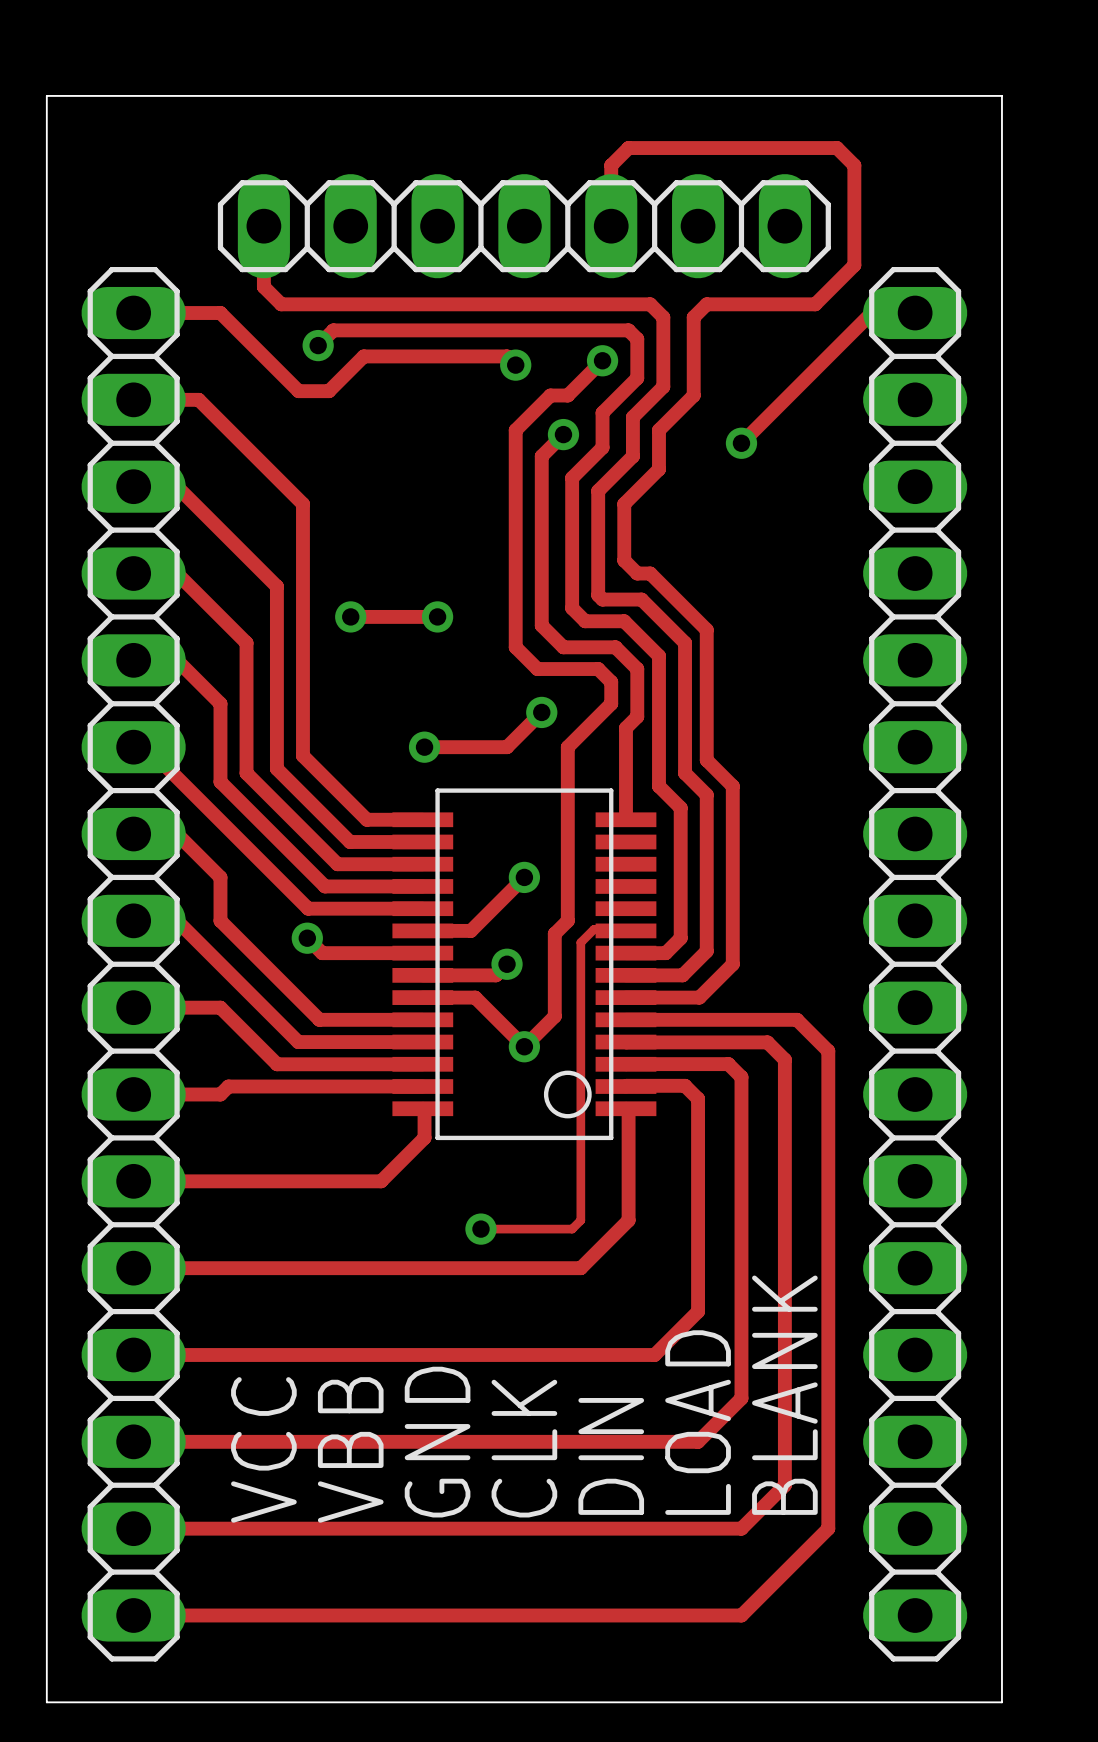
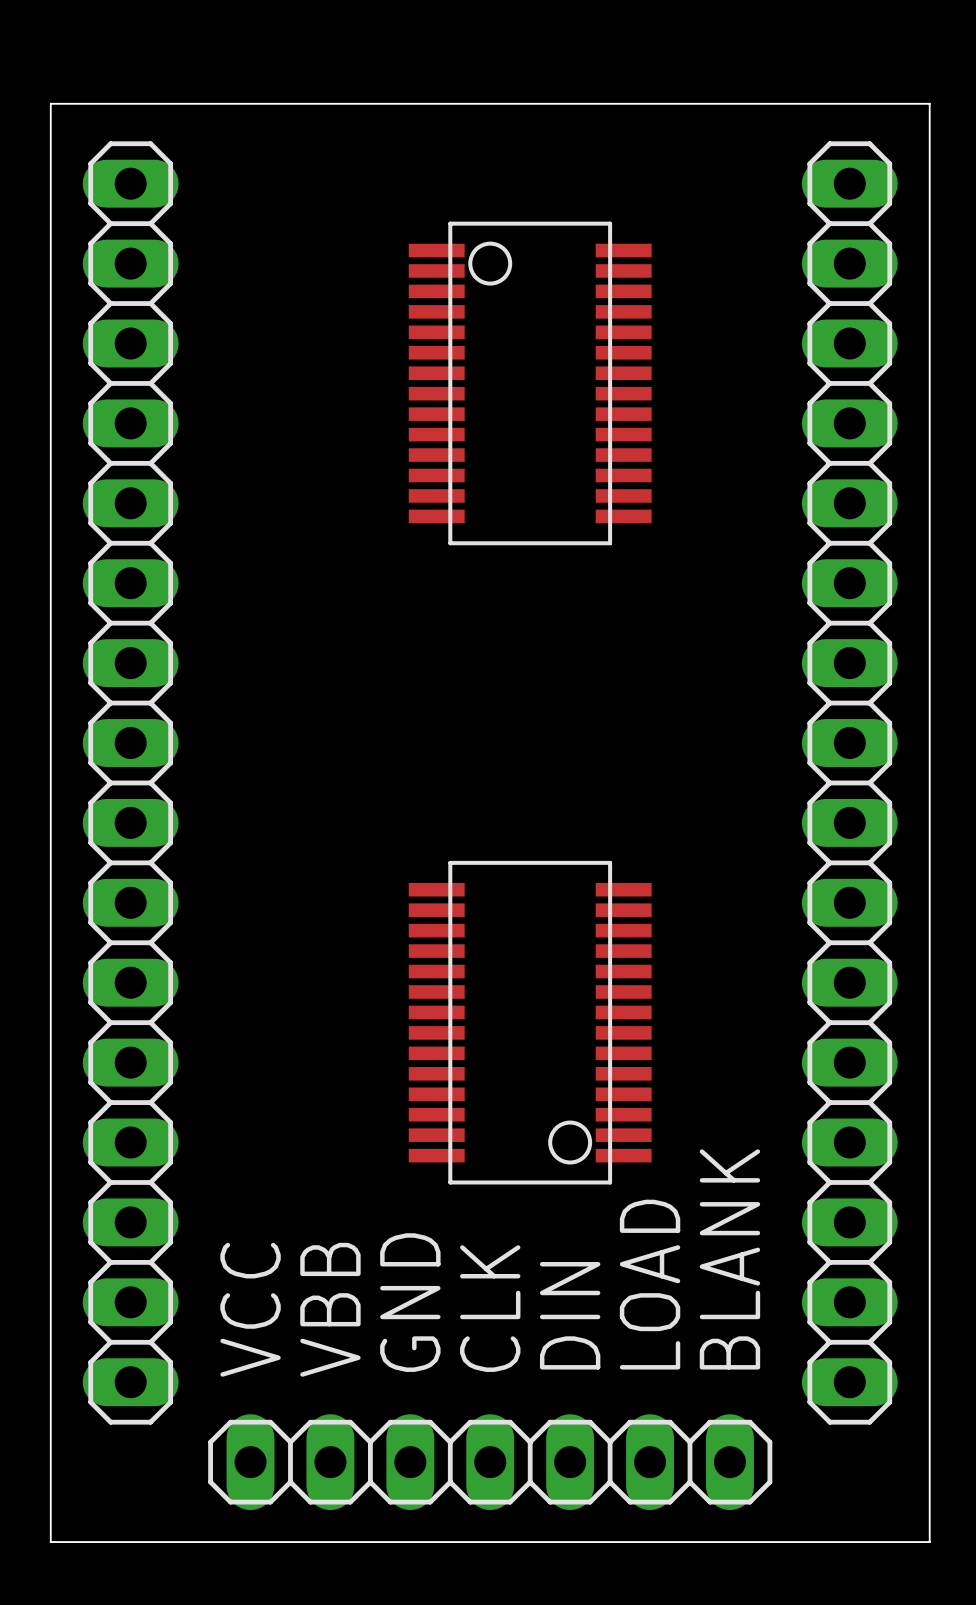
board edge: (46, 139) (46, 95) (1001, 95) (1001, 139) -> (50, 103) (929, 103)
track: (263, 226) (263, 286) (281, 304) (650, 304) (663, 317) (663, 386) (632, 417) (632, 456) (598, 491) (598, 595) (602, 599) (641, 599) (685, 642) (685, 773) (706, 794) (706, 951) (682, 975) (625, 975) -> none
part: (524, 226) -> none
track: (611, 226) (611, 165) (628, 148) (836, 148) (854, 165) (854, 265) (815, 304) (706, 304) (693, 317) (693, 395) (658, 430) (658, 469) (624, 504) (624, 560) (637, 573) (650, 573) (706, 629) (706, 760) (732, 786) (732, 964) (699, 997) (625, 997) -> none
track: (133, 313) (220, 313) (298, 391) (329, 391) (363, 356) (507, 356) (515, 365) -> none
track: (915, 313) (871, 313) (741, 443) -> none
track: (318, 345) (333, 330) (628, 330) (637, 339) (637, 378) (602, 412) (602, 447) (572, 477) (572, 608) (585, 621) (624, 621) (658, 656) (658, 786) (680, 807) (680, 938) (665, 953) (625, 953) -> none
via: (318, 345) -> none
track: (602, 360) (567, 395) (550, 395) (515, 430) (515, 647) (537, 669) (598, 669) (611, 682) (611, 703) (567, 747) (567, 920) (554, 933) (554, 1016) (524, 1046) (475, 997) (422, 997) -> none
via: (602, 360) -> none
via: (515, 365) -> none
track: (133, 399) (198, 399) (302, 504) (302, 755) (366, 819) (422, 819) -> none
track: (563, 434) (541, 456) (541, 625) (563, 647) (615, 647) (637, 669) (637, 716) (625, 728) (625, 819) -> none
via: (563, 434) -> none
part: none -> (530, 383)
via: (741, 443) -> none
track: (133, 486) (177, 486) (276, 586) (276, 768) (350, 841) (422, 841) -> none
track: (133, 573) (177, 573) (246, 642) (246, 773) (337, 864) (422, 864) -> none
track: (350, 616) (437, 616) -> none
via: (350, 616) -> none
via: (437, 616) -> none
track: (133, 660) (177, 660) (220, 703) (220, 781) (325, 886) (422, 886) -> none
track: (541, 712) (507, 747) (424, 747) -> none
via: (541, 712) -> none
track: (133, 747) (146, 747) (308, 908) (422, 908) -> none
via: (424, 747) -> none
track: (133, 834) (177, 834) (220, 877) (220, 920) (319, 1019) (422, 1019) -> none
track: (524, 877) (470, 930) (422, 930) -> none
via: (524, 877) -> none
track: (133, 920) (177, 920) (298, 1042) (422, 1042) -> none
track: (625, 930) (593, 929) (580, 942) (580, 1220) (572, 1229) (480, 1229) -> none
track: (307, 938) (322, 953) (422, 953) -> none
via: (307, 938) -> none
part position: (133, 964) -> (130, 782)
track: (507, 964) (495, 975) (422, 975) -> none
via: (507, 964) -> none
part position: (524, 964) -> (530, 1022)
part position: (915, 964) -> (849, 782)
track: (133, 1007) (220, 1007) (277, 1064) (422, 1064) -> none
track: (625, 1019) (797, 1019) (828, 1051) (828, 1528) (741, 1615) (133, 1615) -> none
track: (626, 1042) (767, 1042) (784, 1059) (784, 1485) (741, 1528) (133, 1528) -> none
via: (524, 1046) -> none
track: (626, 1064) (728, 1064) (741, 1077) (741, 1398) (698, 1441) (133, 1441) -> none
track: (422, 1086) (228, 1086) (220, 1094) (133, 1094) -> none
track: (625, 1086) (685, 1085) (698, 1098) (698, 1311) (654, 1355) (133, 1355) -> none
track: (422, 1108) (424, 1110) (424, 1137) (381, 1181) (133, 1181) -> none
track: (625, 1108) (628, 1111) (628, 1220) (580, 1268) (133, 1268) -> none
via: (480, 1229) -> none
part: none -> (490, 1462)

